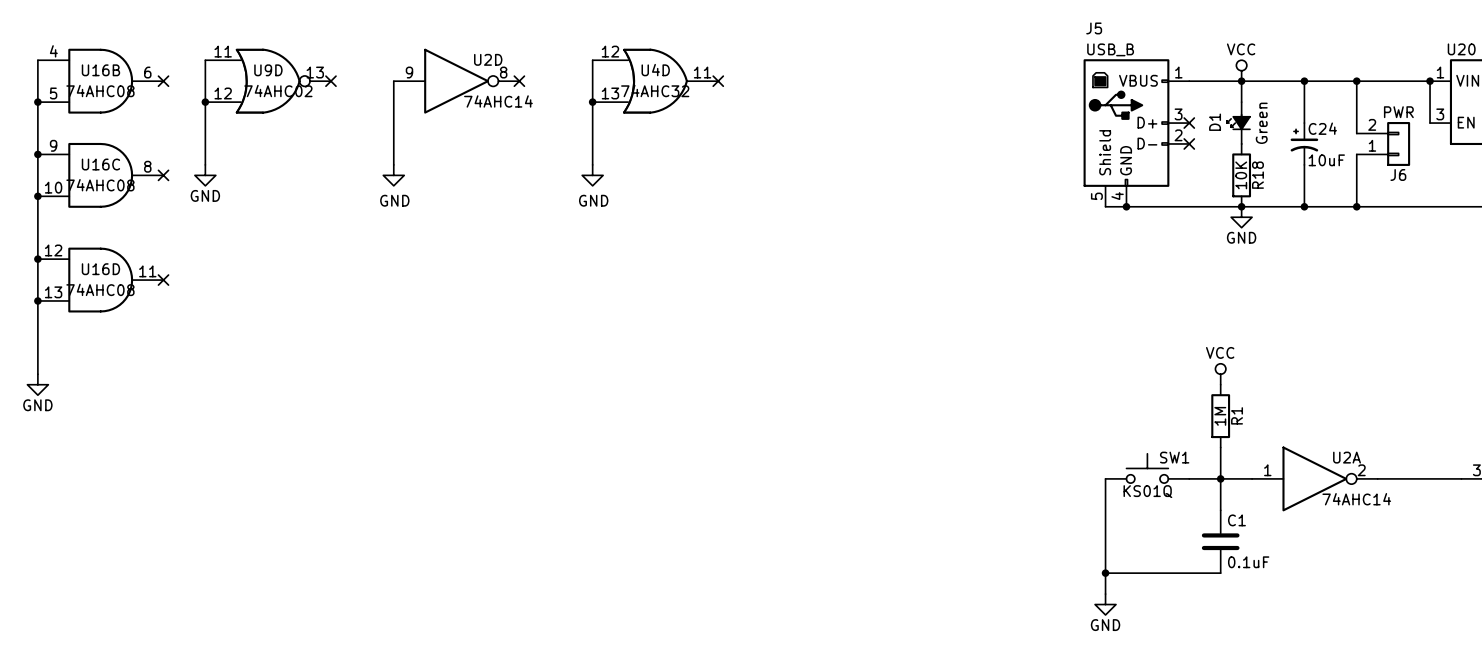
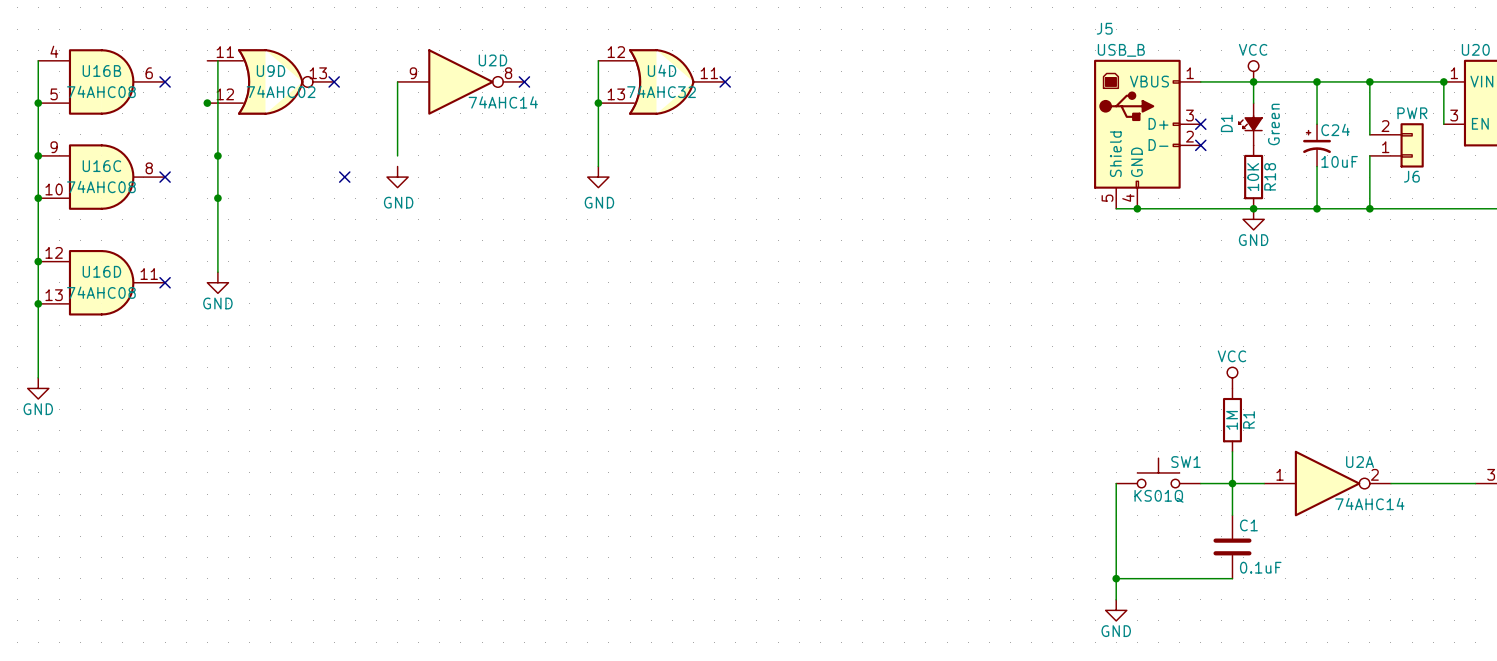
wire: (205, 60) (205, 164) -> none
wire: none -> (217, 60) (217, 272)
junction: none -> (217, 155)
wire: (393, 154) (393, 164) -> none
power symbol position: GND (205, 175) -> GND (217, 282)
no-connect mark: none -> (344, 177)
junction: none -> (217, 198)

